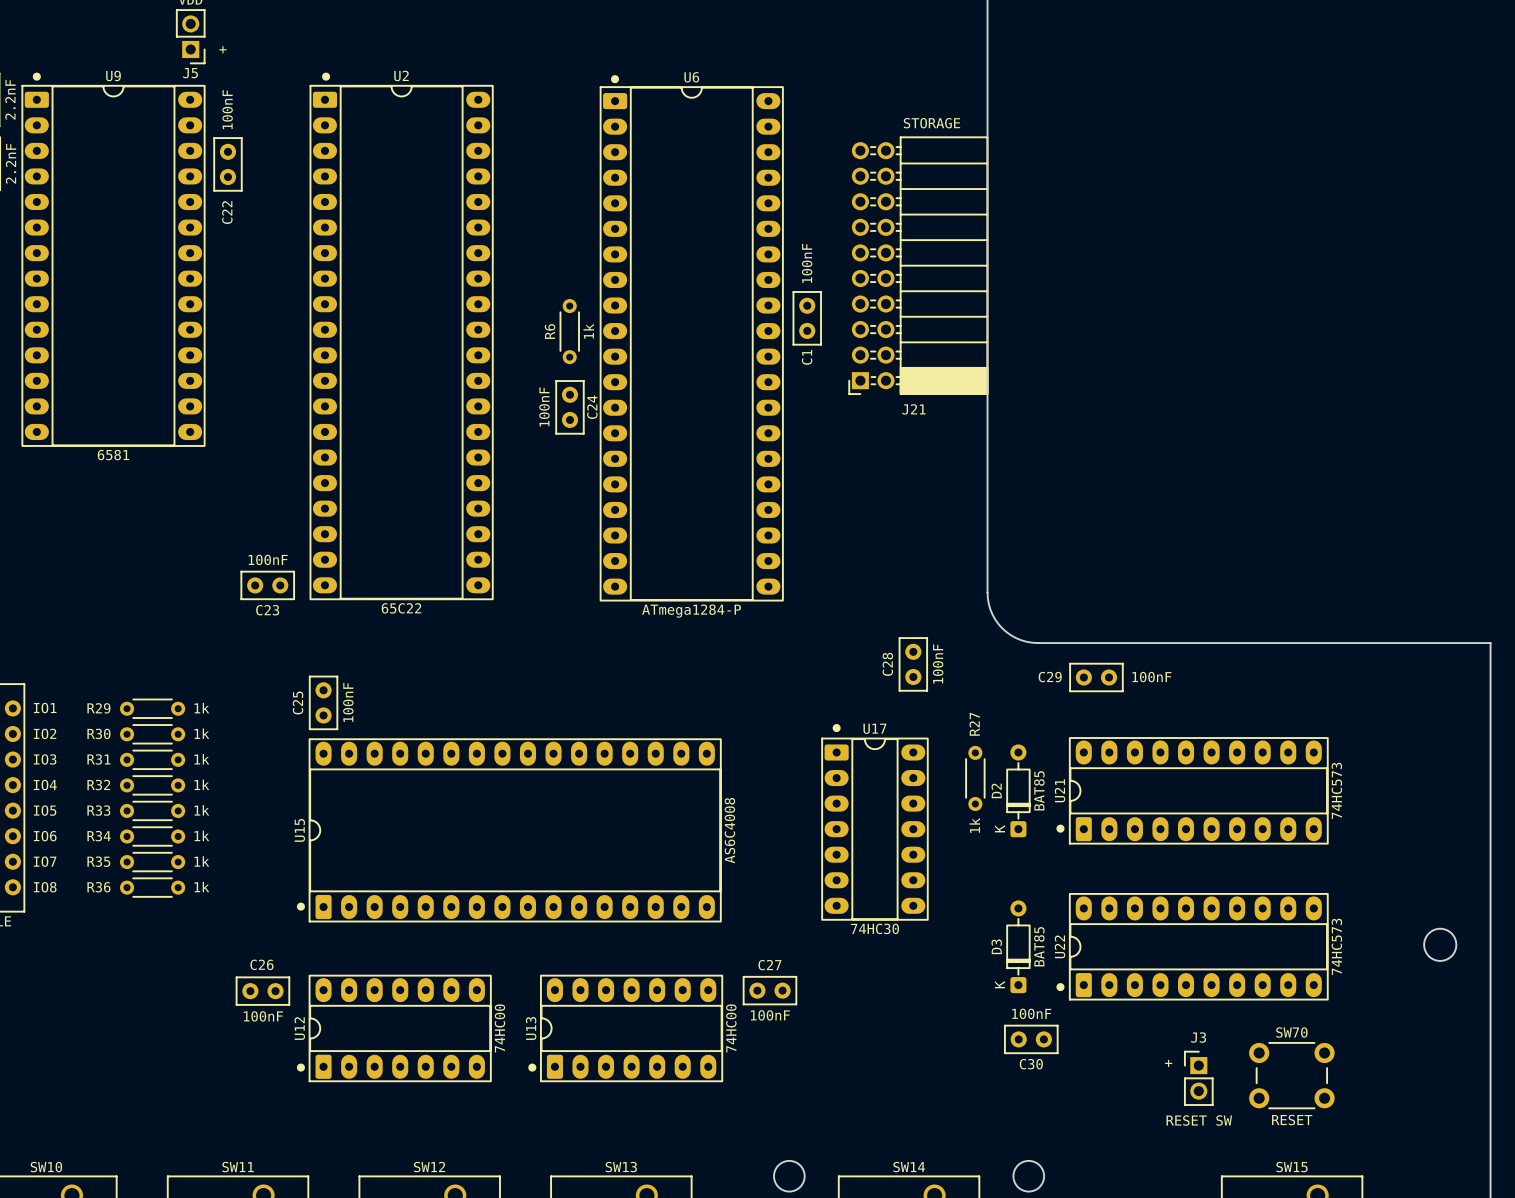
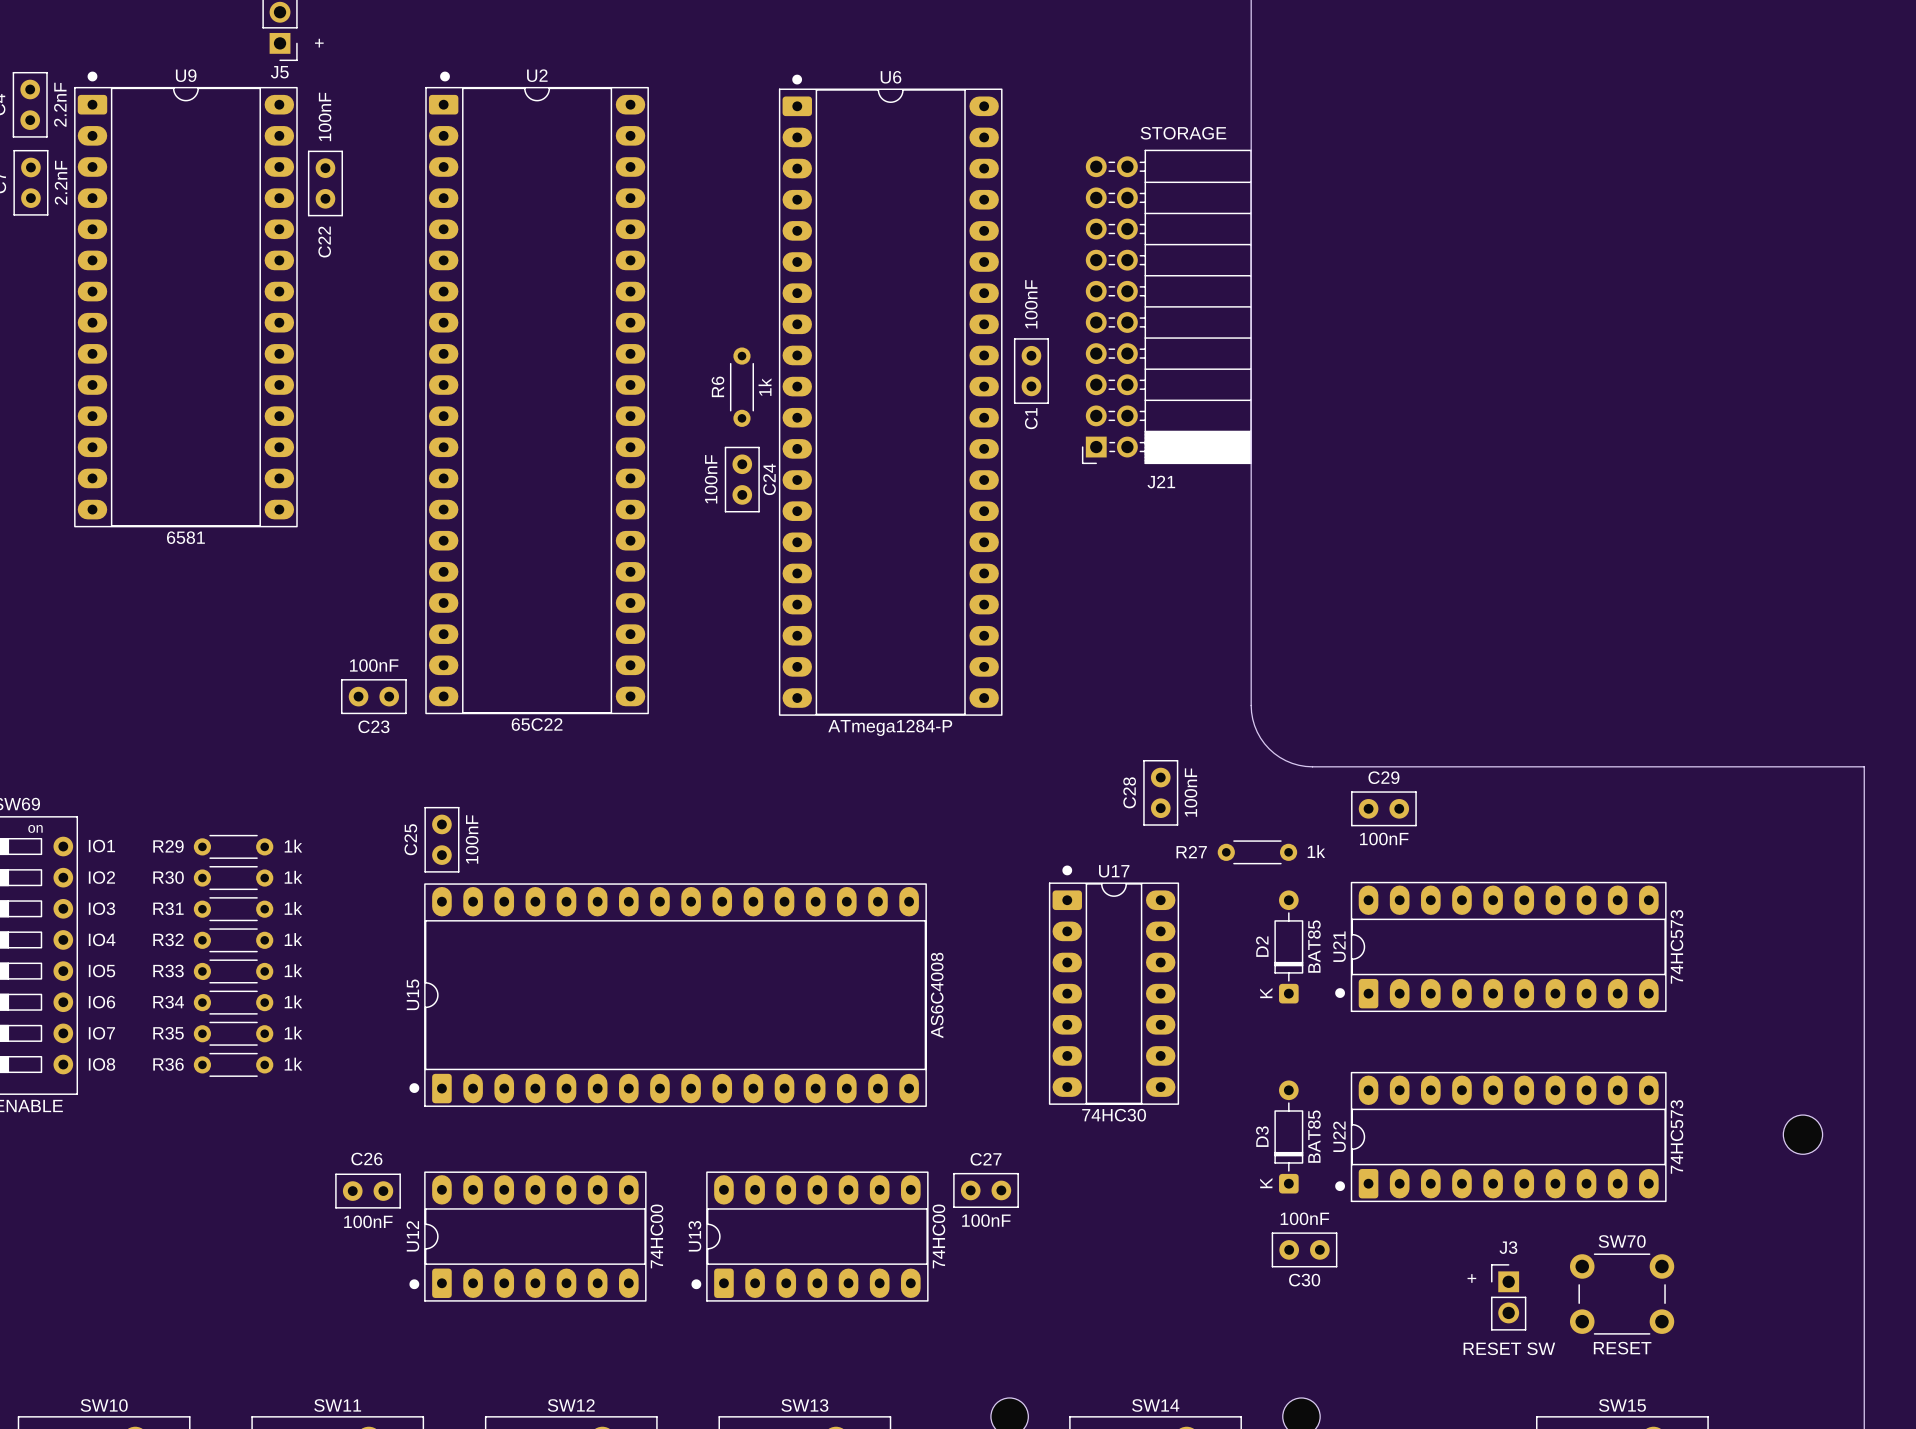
C29 name position: C29 (1050, 677) -> C29 (1383, 777)
C29 value position: 100nF (1151, 677) -> 100nF (1384, 839)
R27 name position: R27 (974, 724) -> R27 (1191, 852)
R27 rotation: 0° (975, 778) -> 90° clockwise (1257, 852)
R27 position: (975, 778) -> (1257, 852)
R27 value position: 1k (974, 825) -> 1k (1316, 851)

